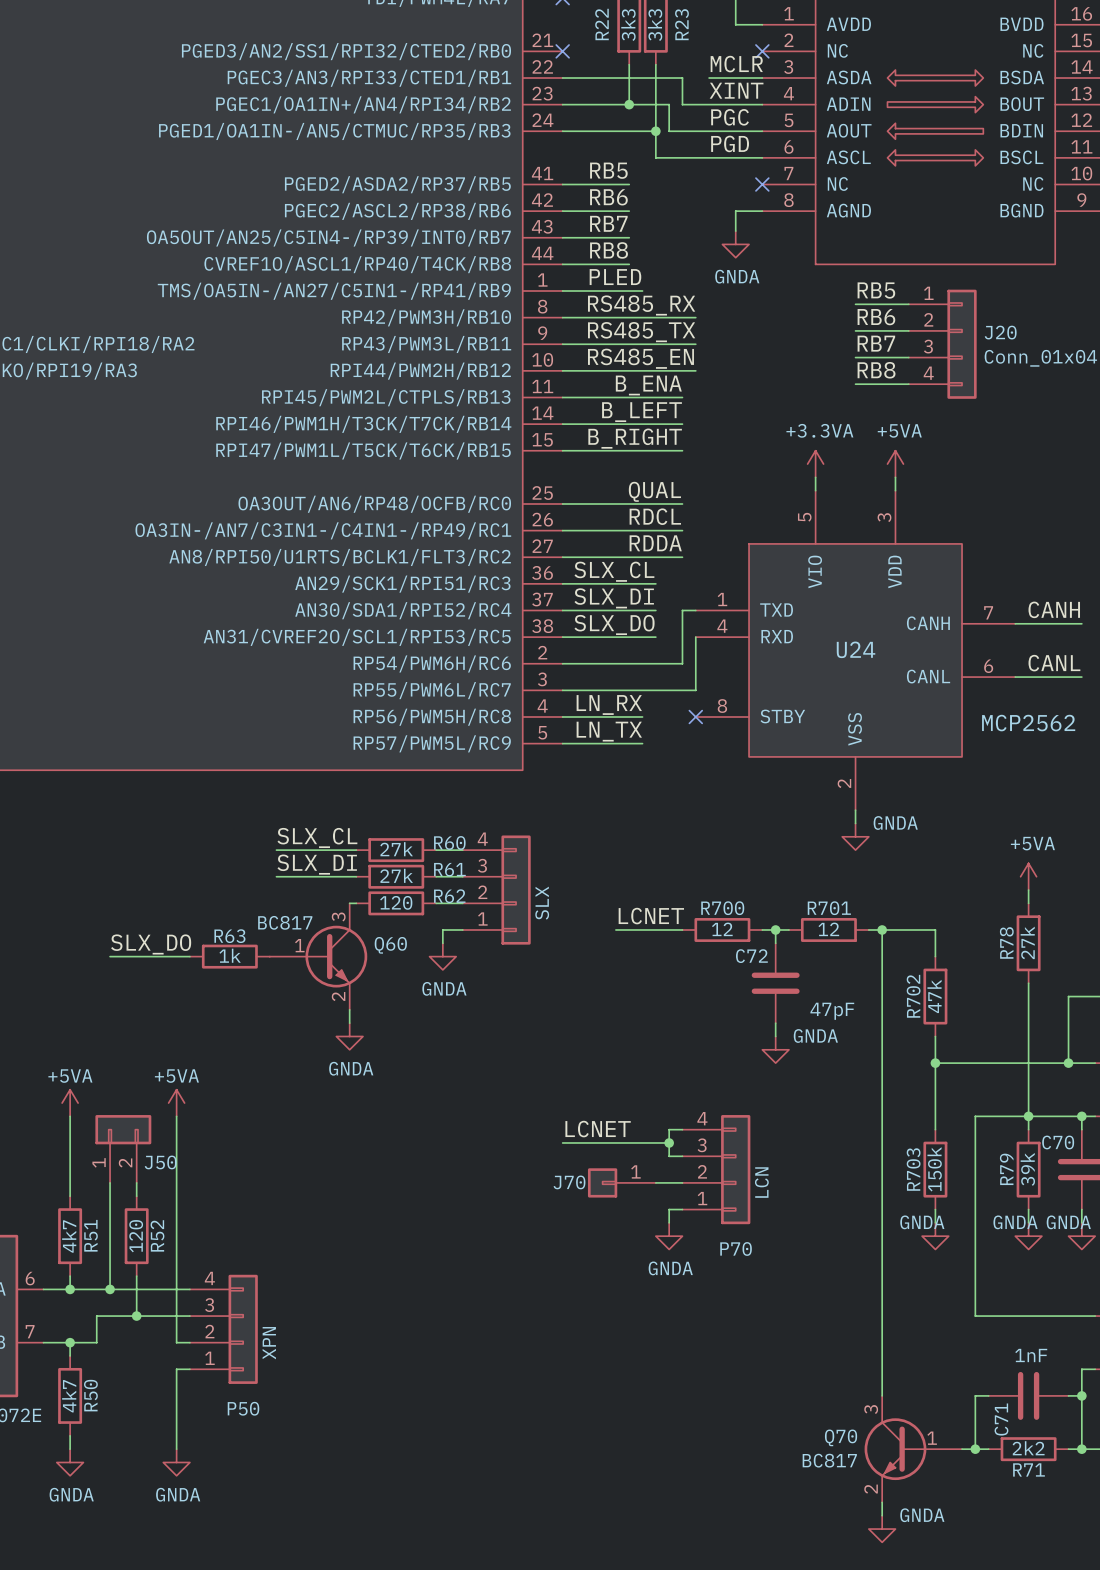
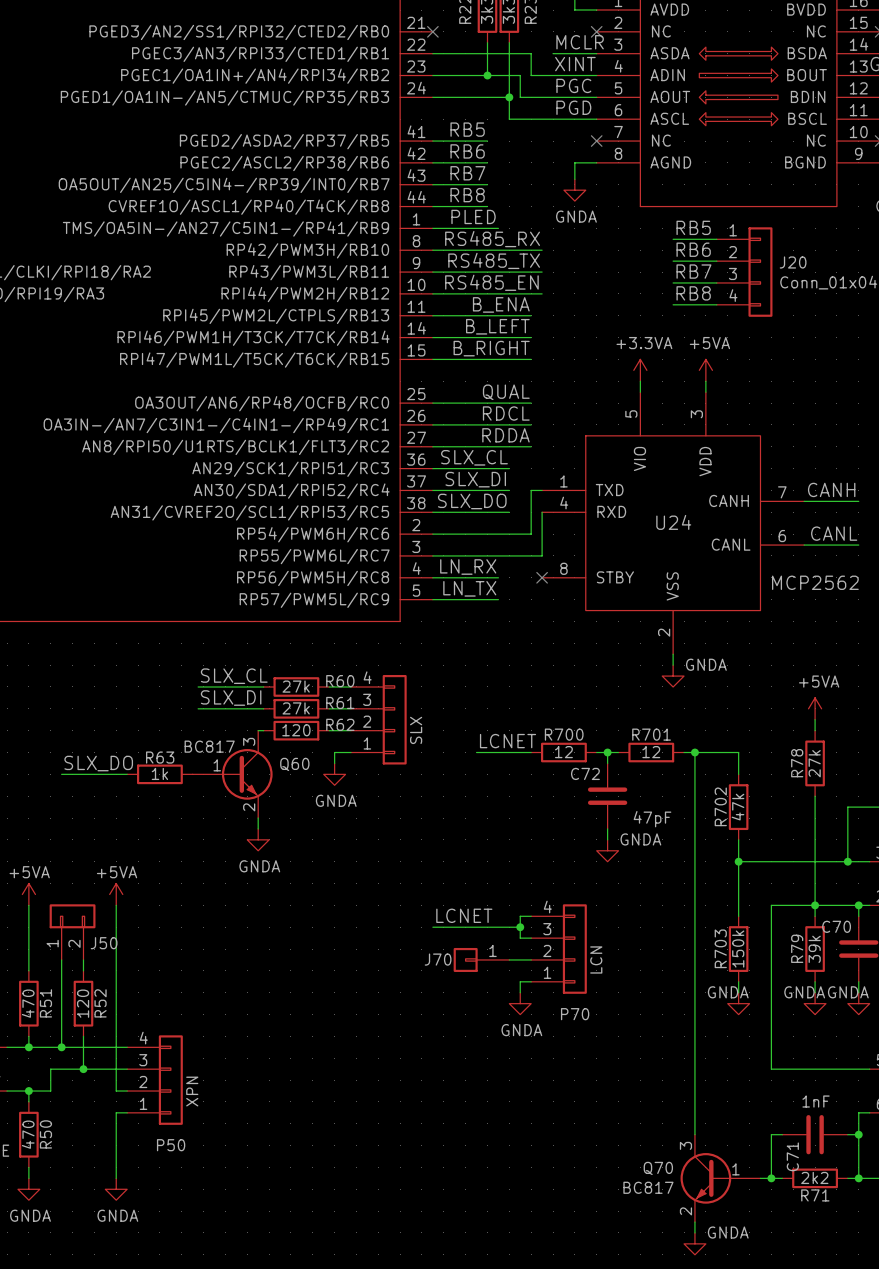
R51 value: 4k7 (69, 1236) -> 470 (28, 1003)
R50 value: 4k7 (69, 1396) -> 470 (28, 1134)

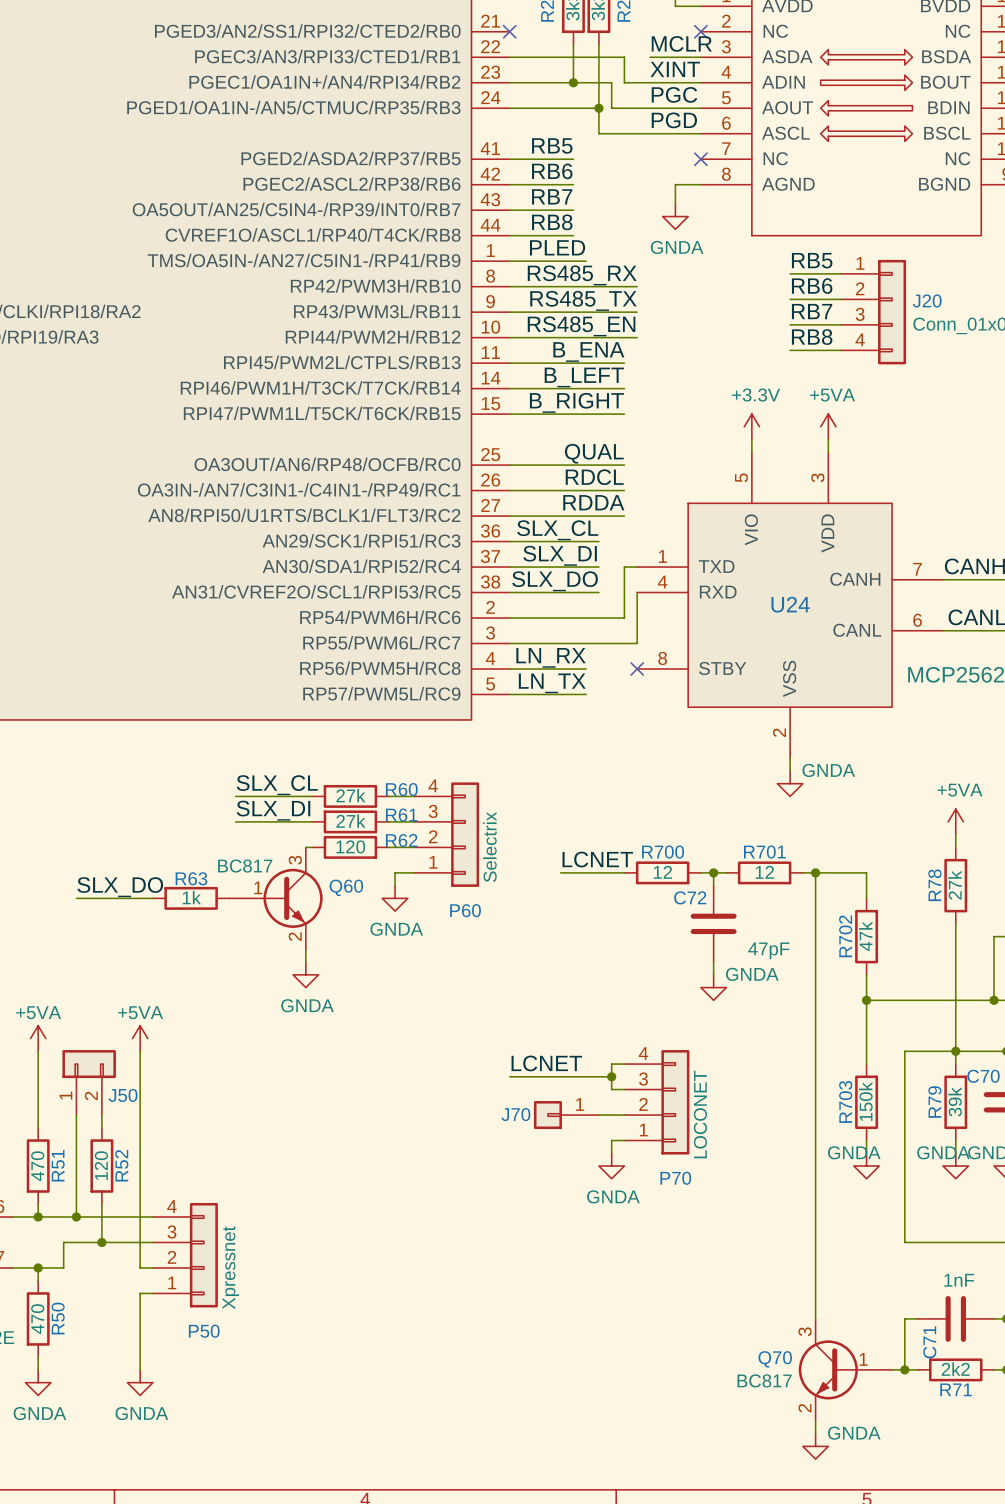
power symbol: +3.3VA (640, 370) -> +3.3V (751, 426)
P60 value: SLX (416, 730) -> Selectrix (489, 847)
P60 name: none -> P60 (465, 910)
P70 value: LCN (596, 959) -> LOCONET (700, 1114)
P50 value: XPN (192, 1091) -> Xpressnet (230, 1267)

